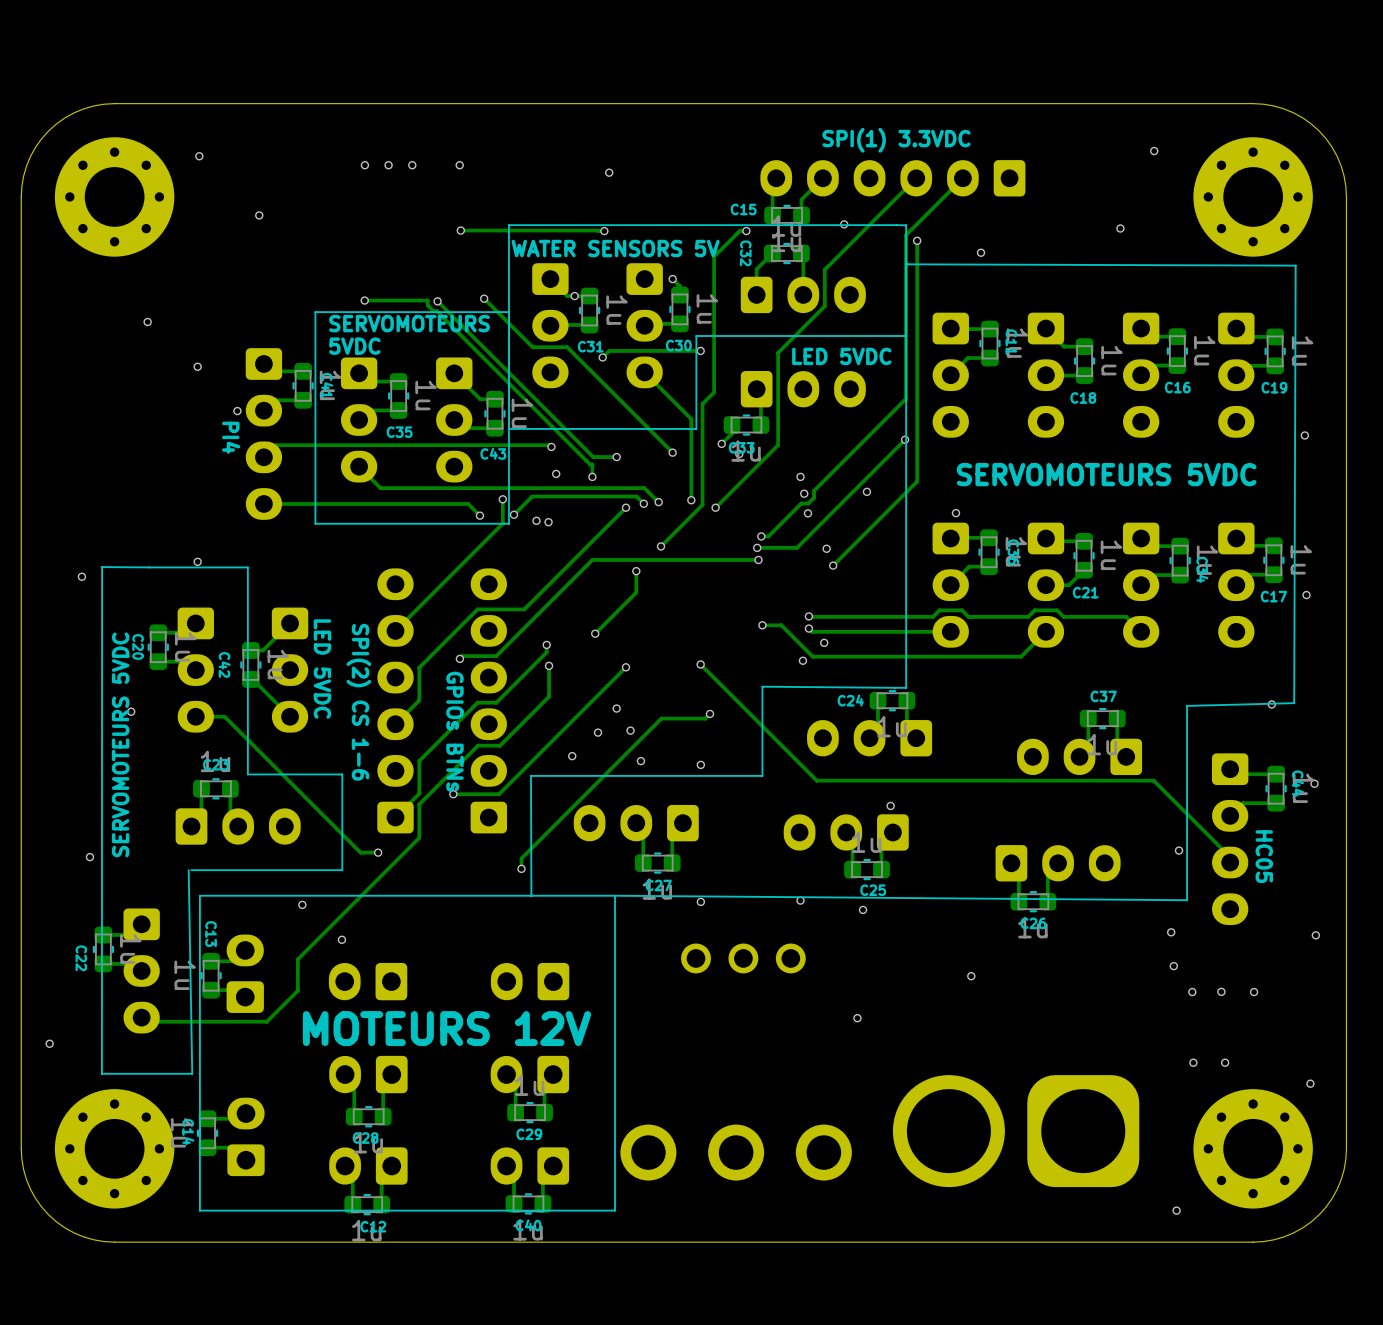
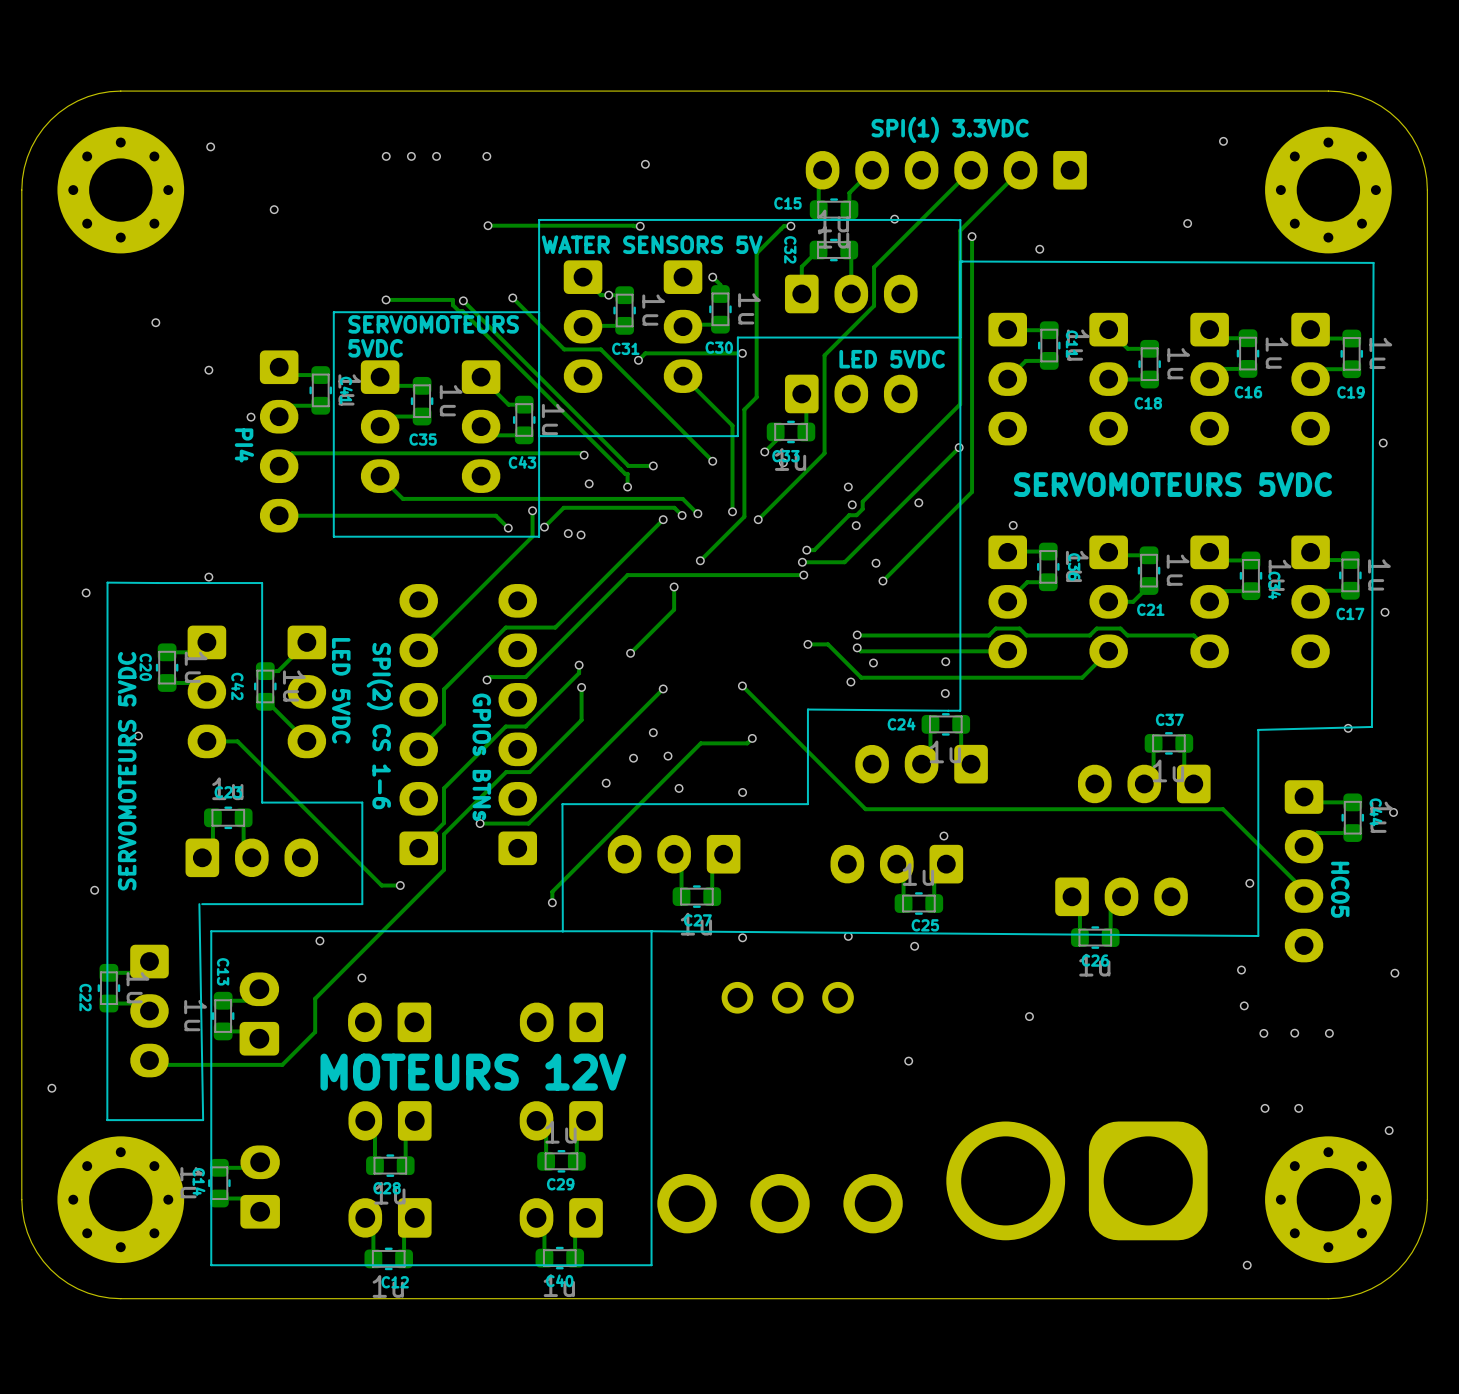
via: none -> (945, 661)
via: none -> (945, 693)

